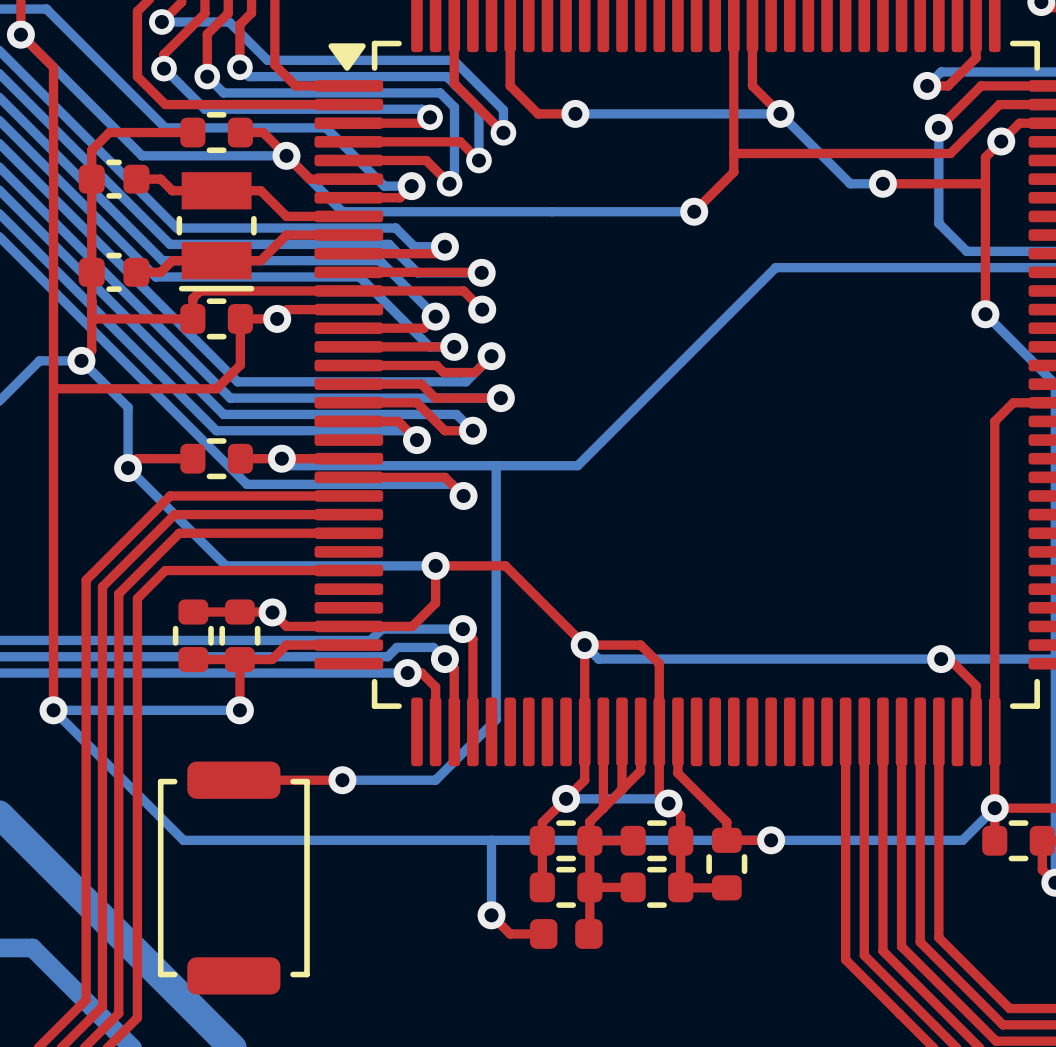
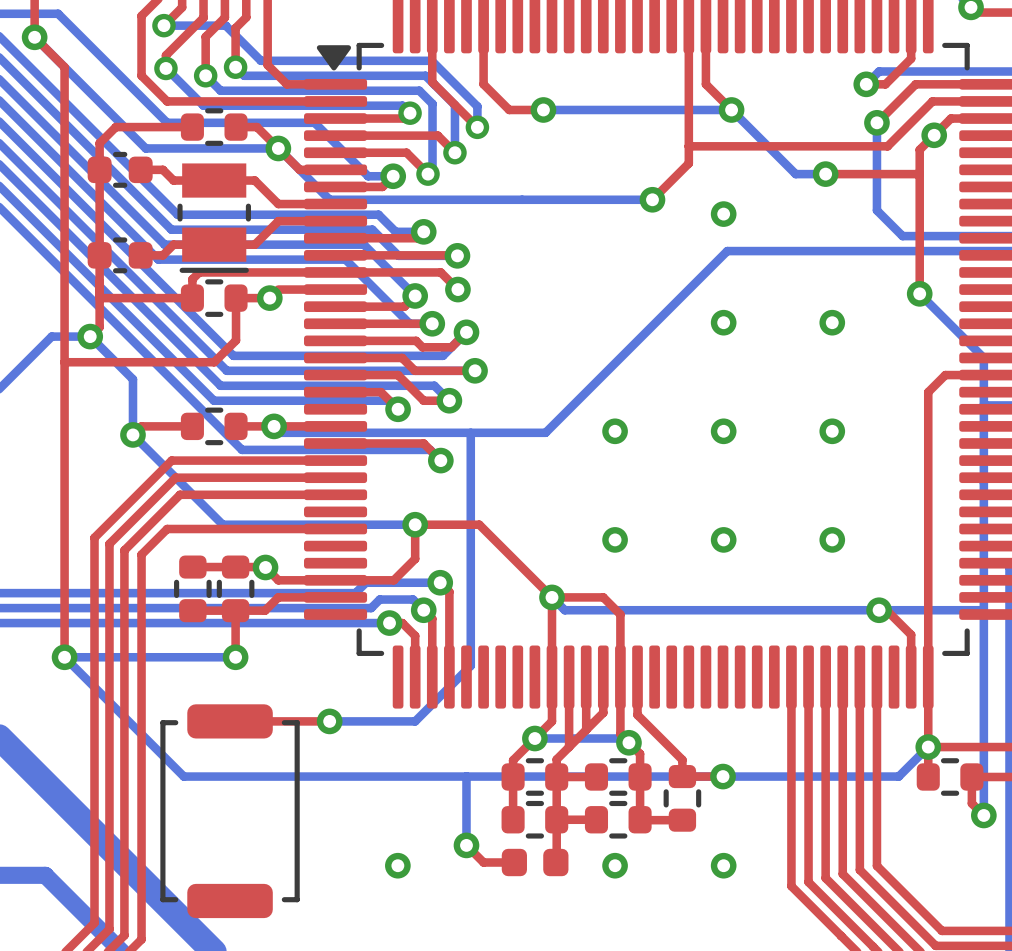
via: none -> (723, 214)
via: none -> (723, 322)
via: none -> (832, 322)
via: none -> (615, 431)
via: none -> (723, 431)
via: none -> (832, 431)
via: none -> (615, 539)
via: none -> (723, 539)
via: none -> (832, 539)
via: none -> (397, 865)
via: none -> (615, 865)
via: none -> (723, 865)

